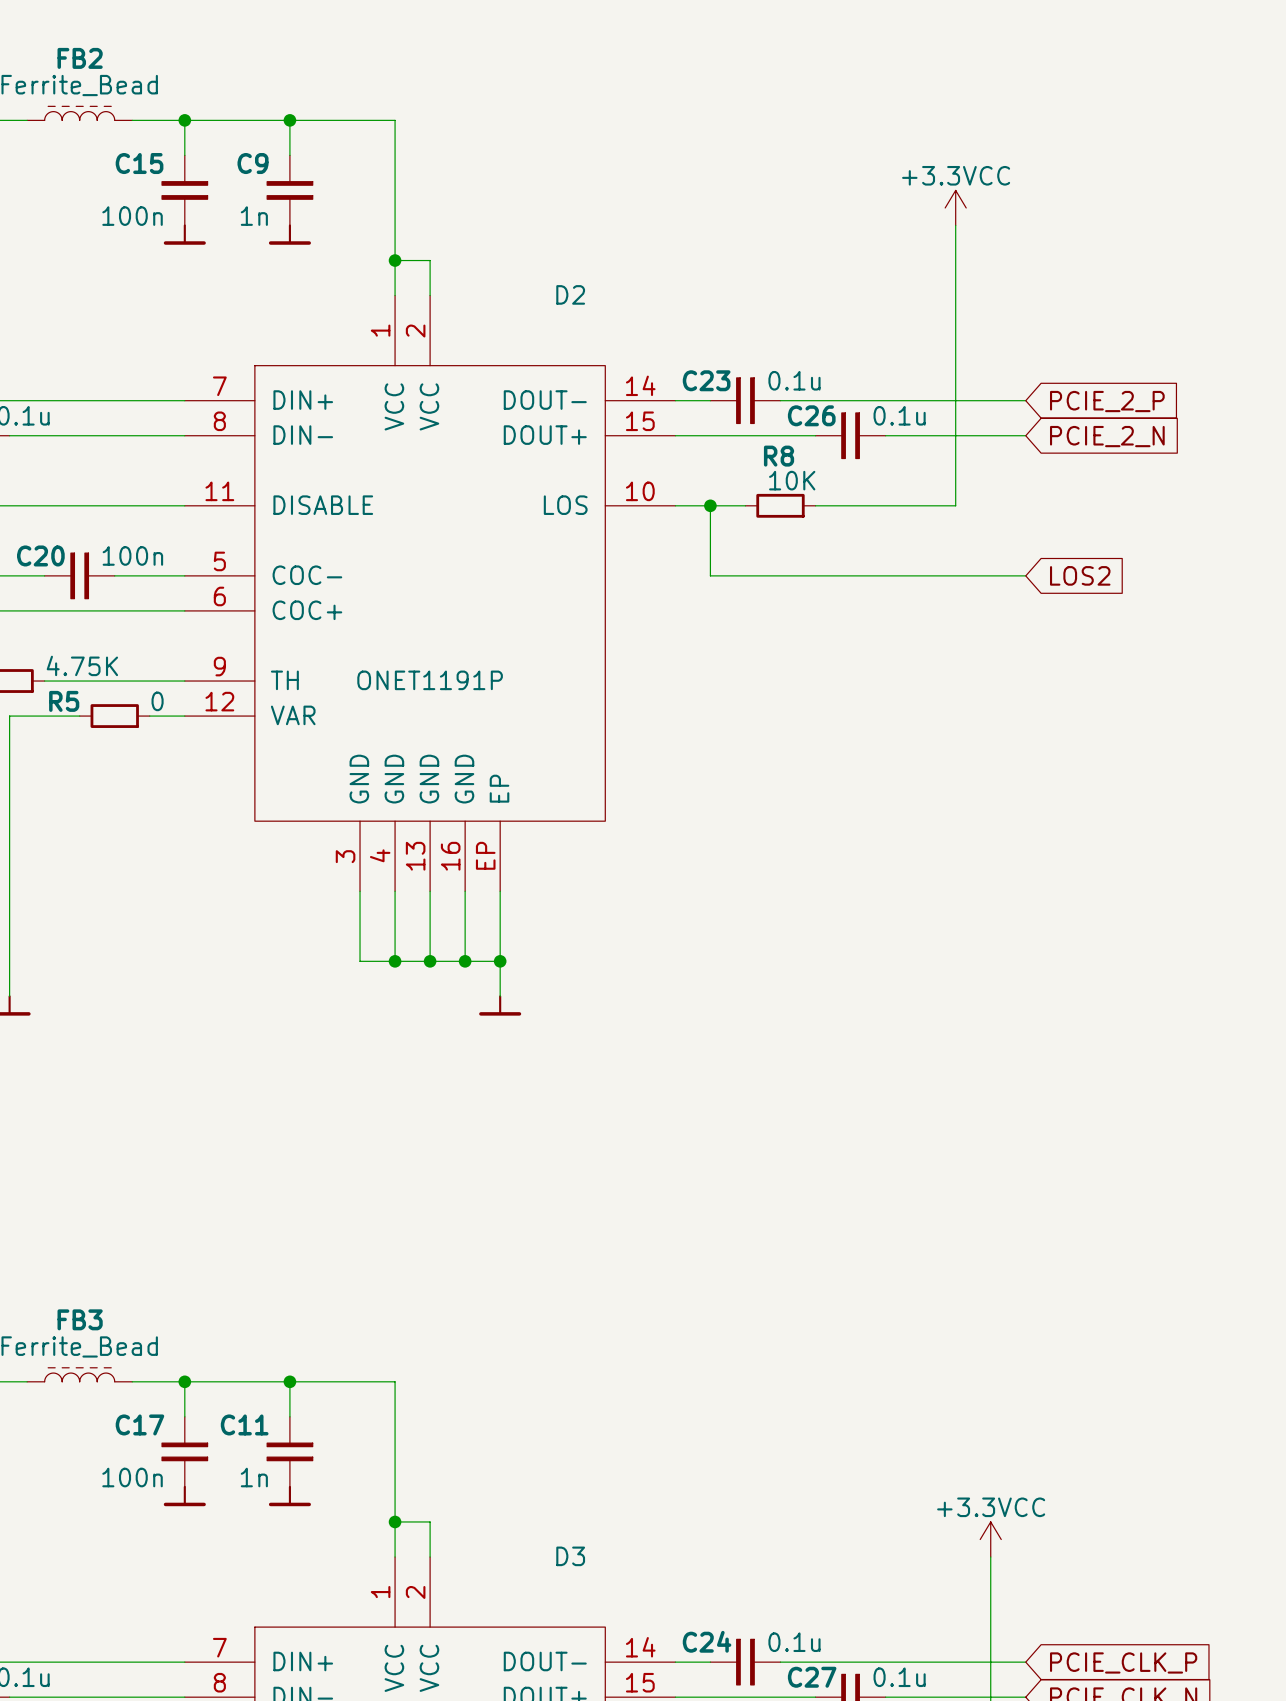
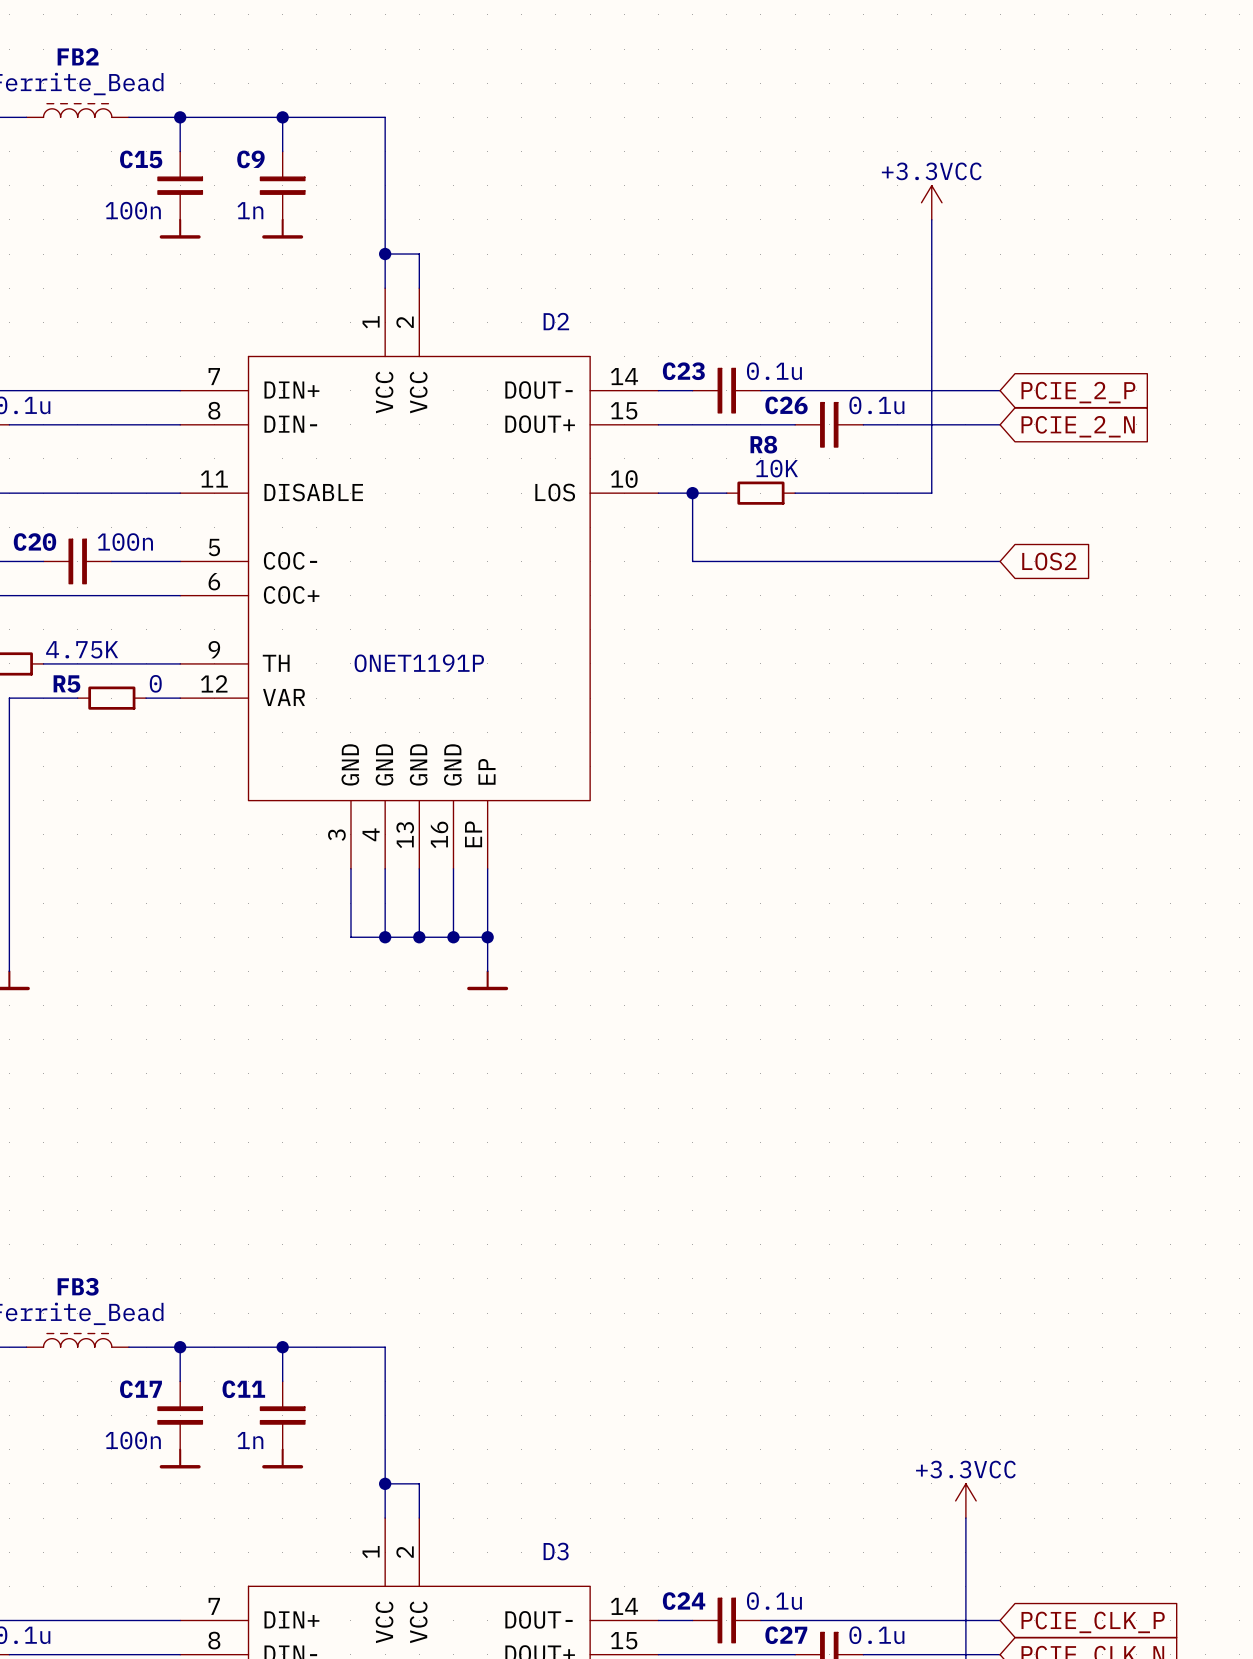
D2 name position: D2 (570, 294) -> D2 (556, 321)
D3 name position: D3 (570, 1556) -> D3 (556, 1551)

